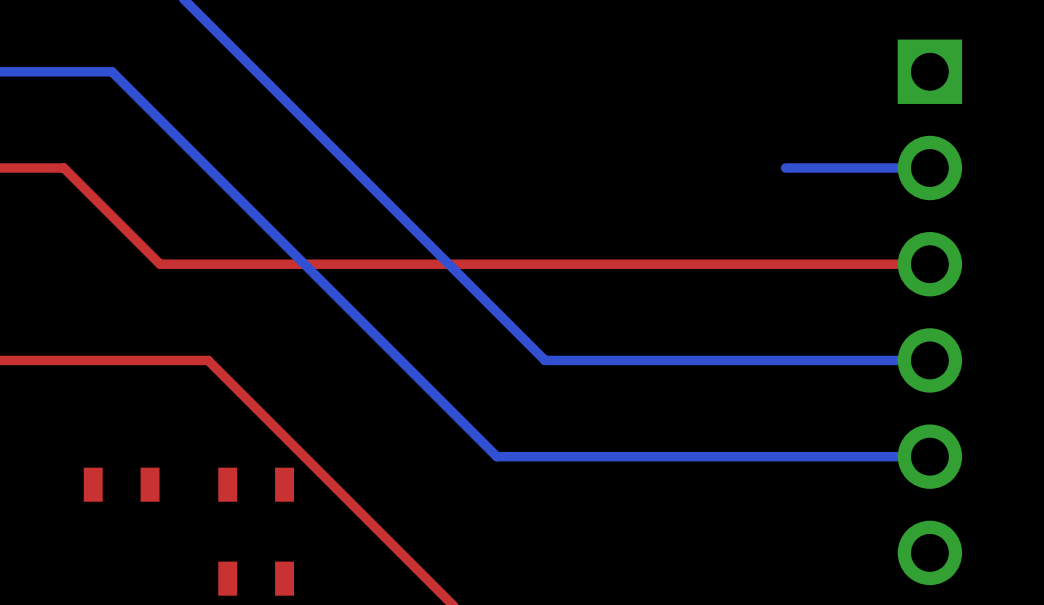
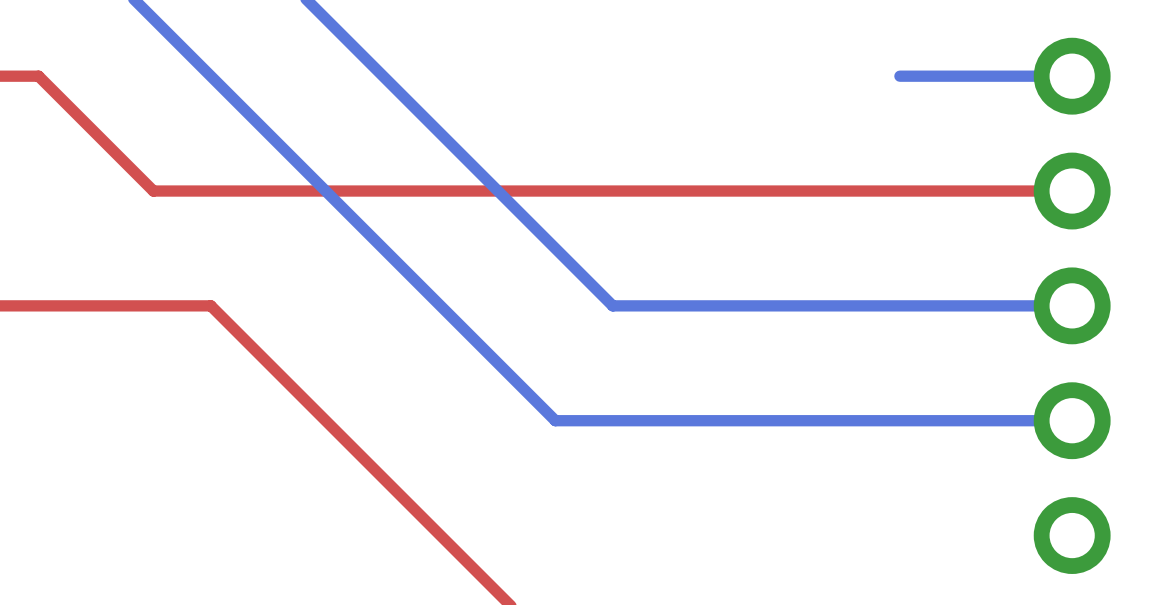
part: (121, 484) -> none
part: (256, 484) -> none
part: (256, 578) -> none

